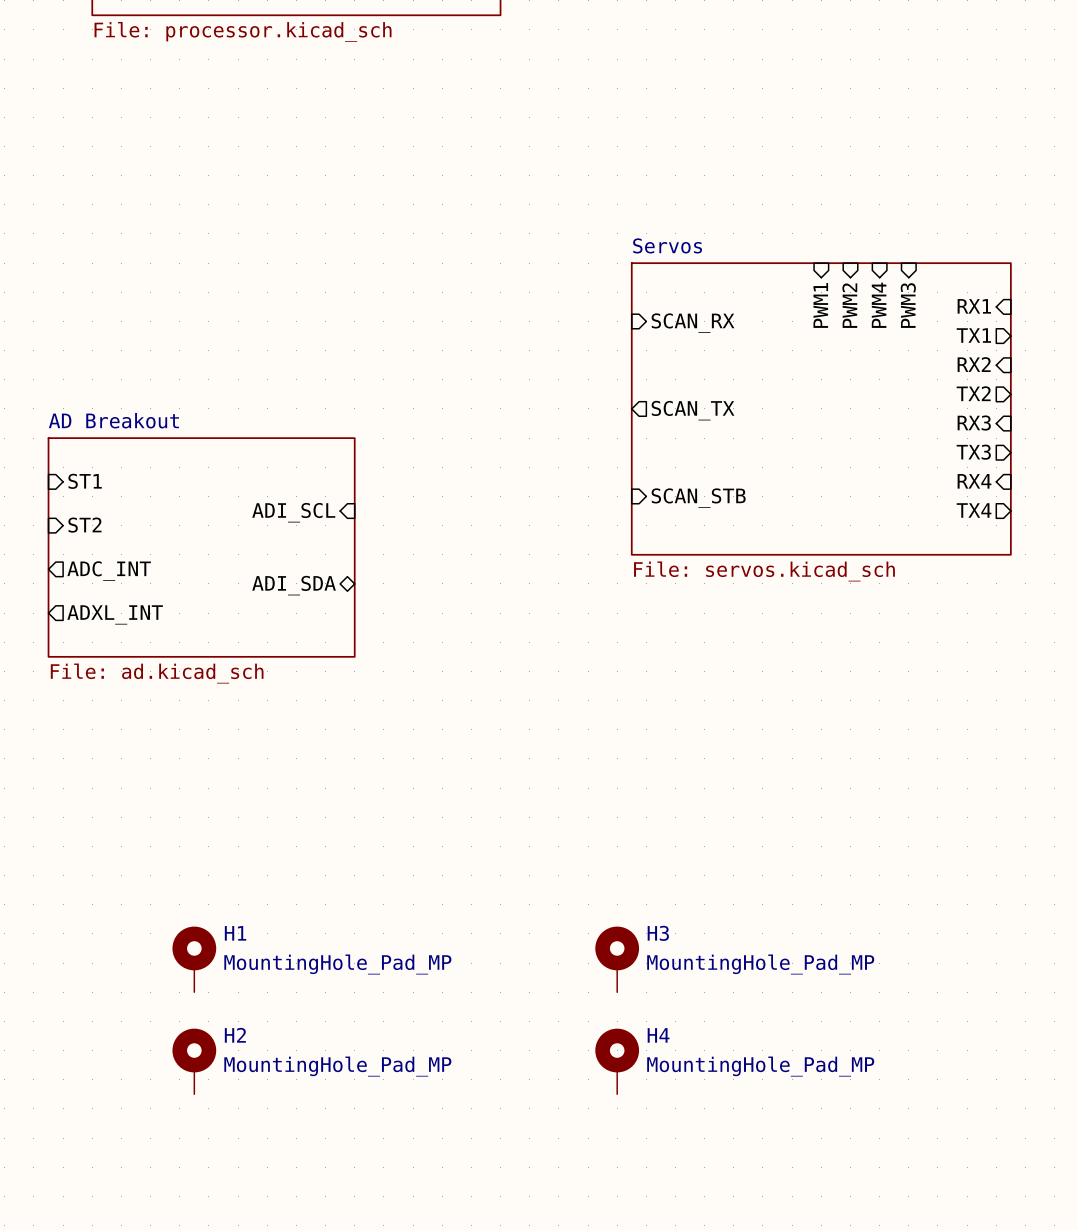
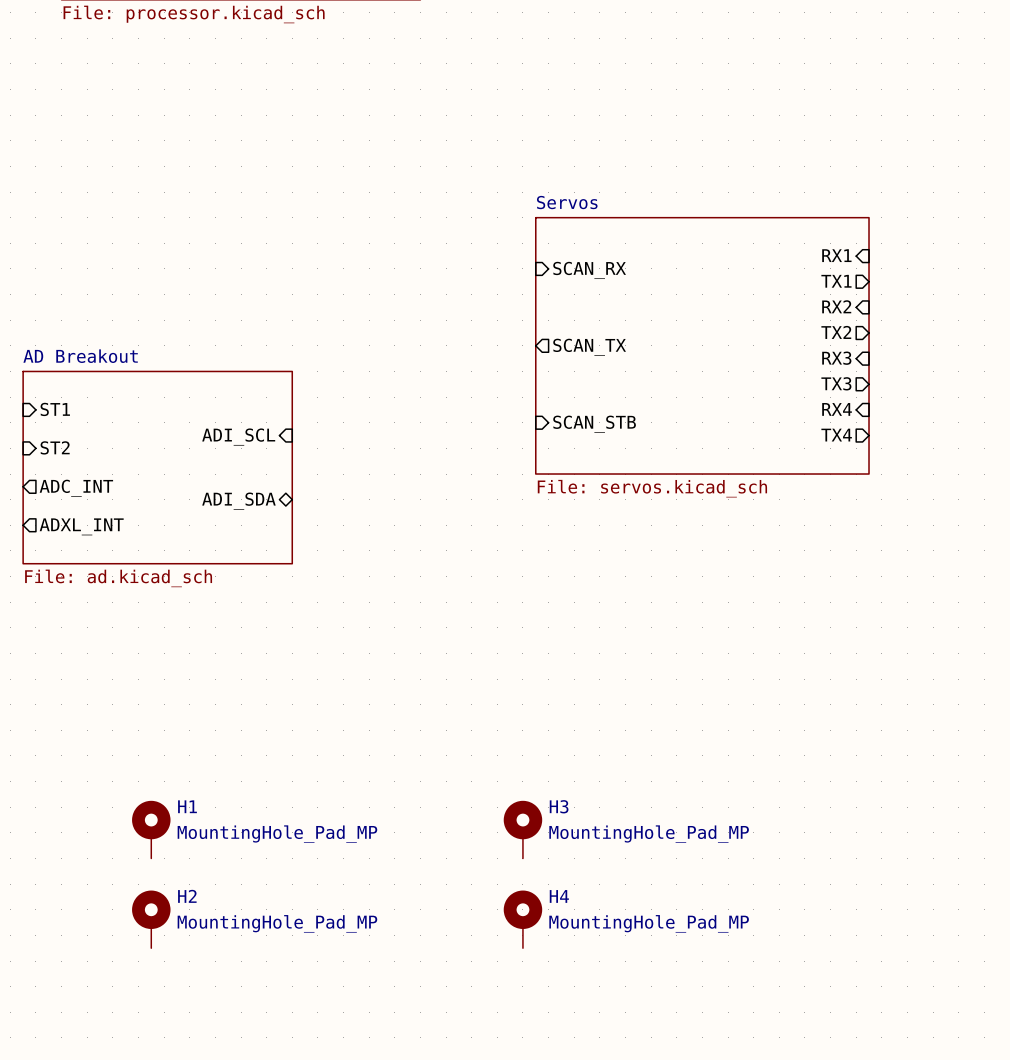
sheet pin: PWM1 (820, 305) -> none
sheet pin: PWM2 (849, 305) -> none
sheet pin: PWM4 (879, 305) -> none
sheet pin: PWM3 (908, 305) -> none

